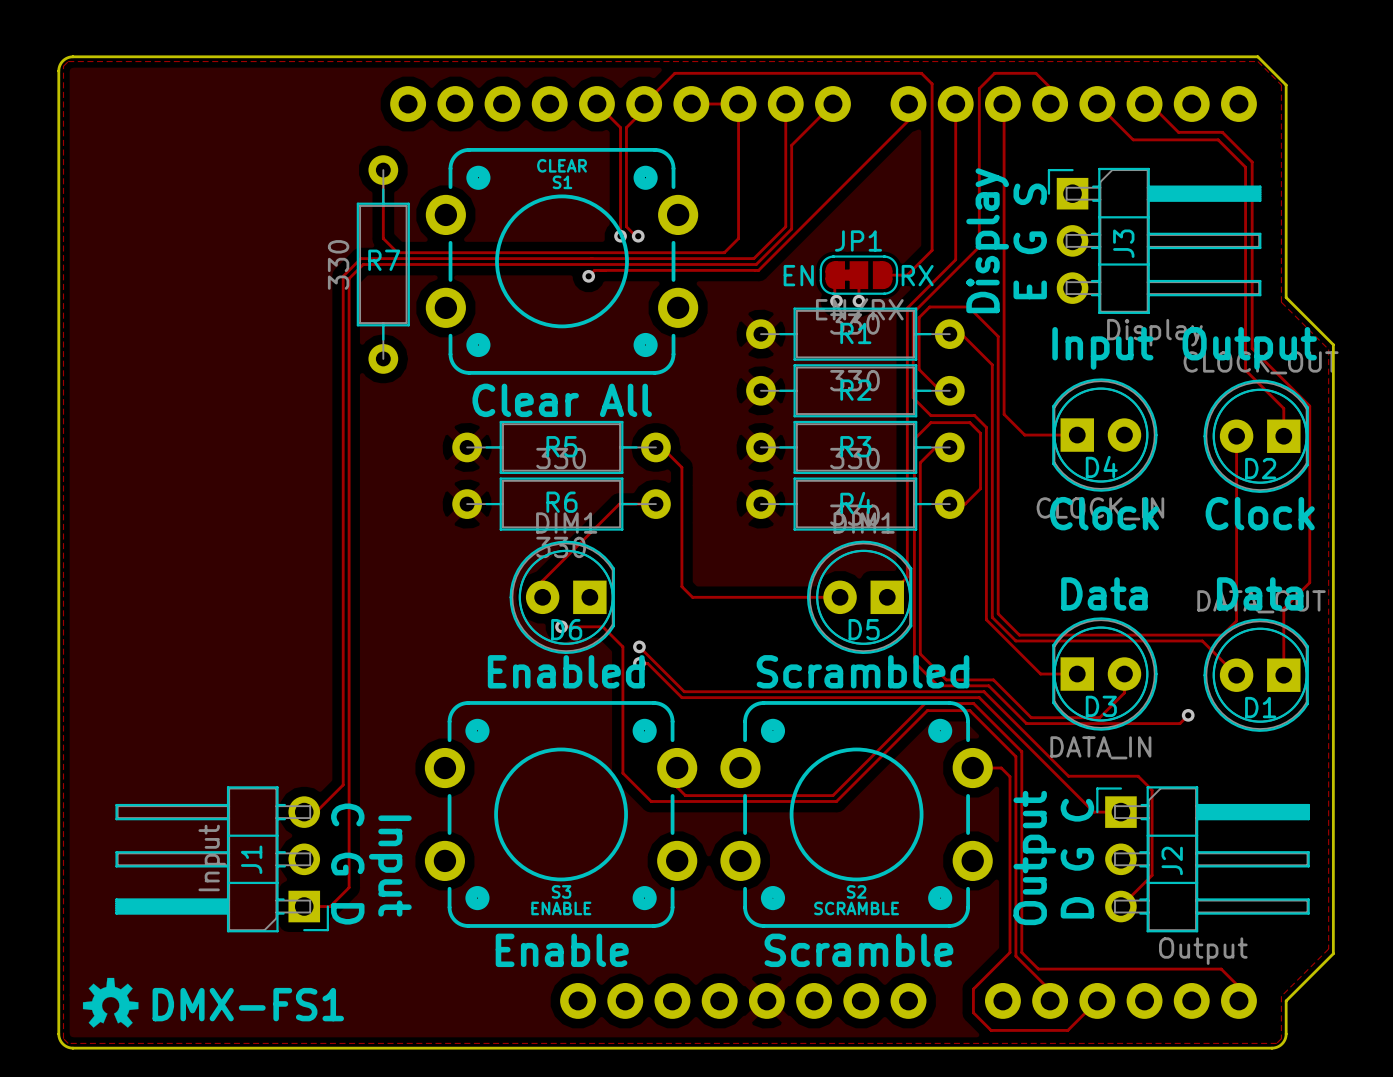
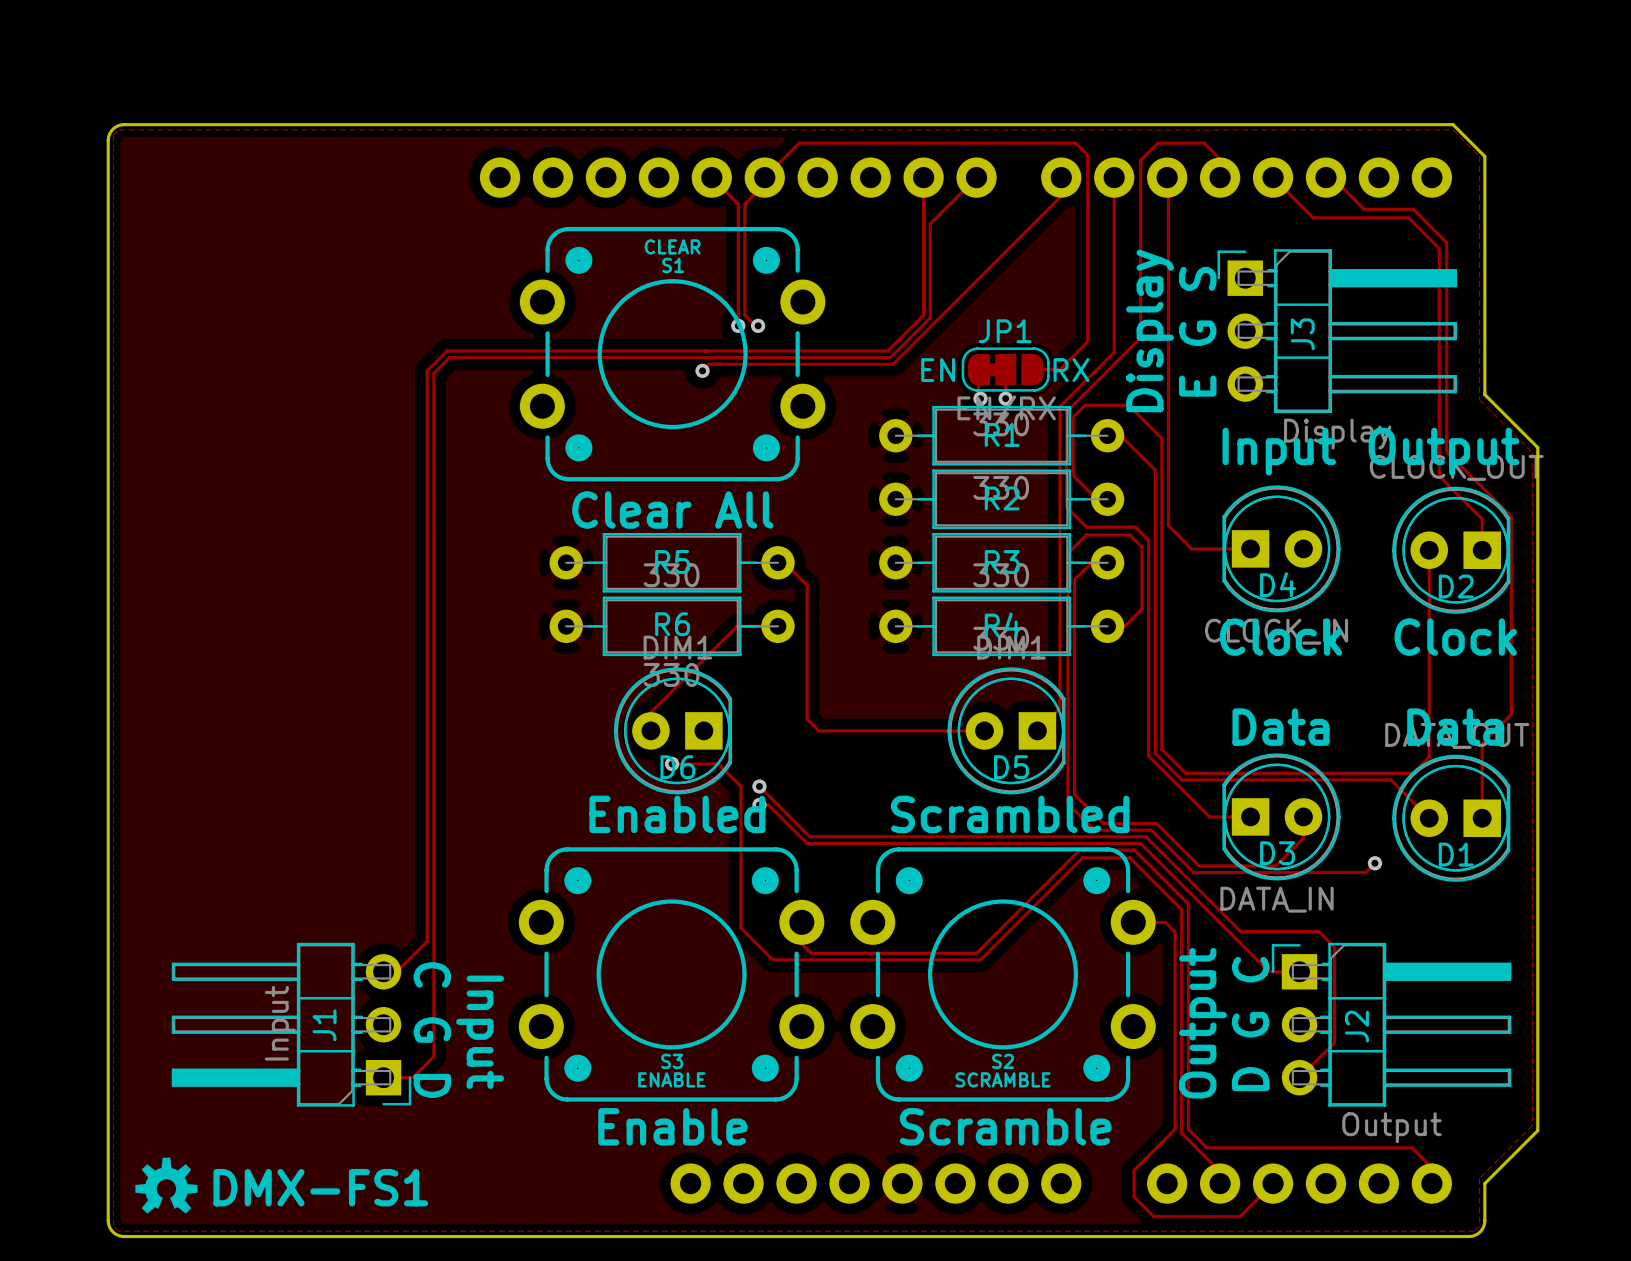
track: (691, 104) (738, 104) (738, 238) (724, 252) (397, 252) (383, 238) (383, 170) -> none
R7: 330 (383, 264) -> none

